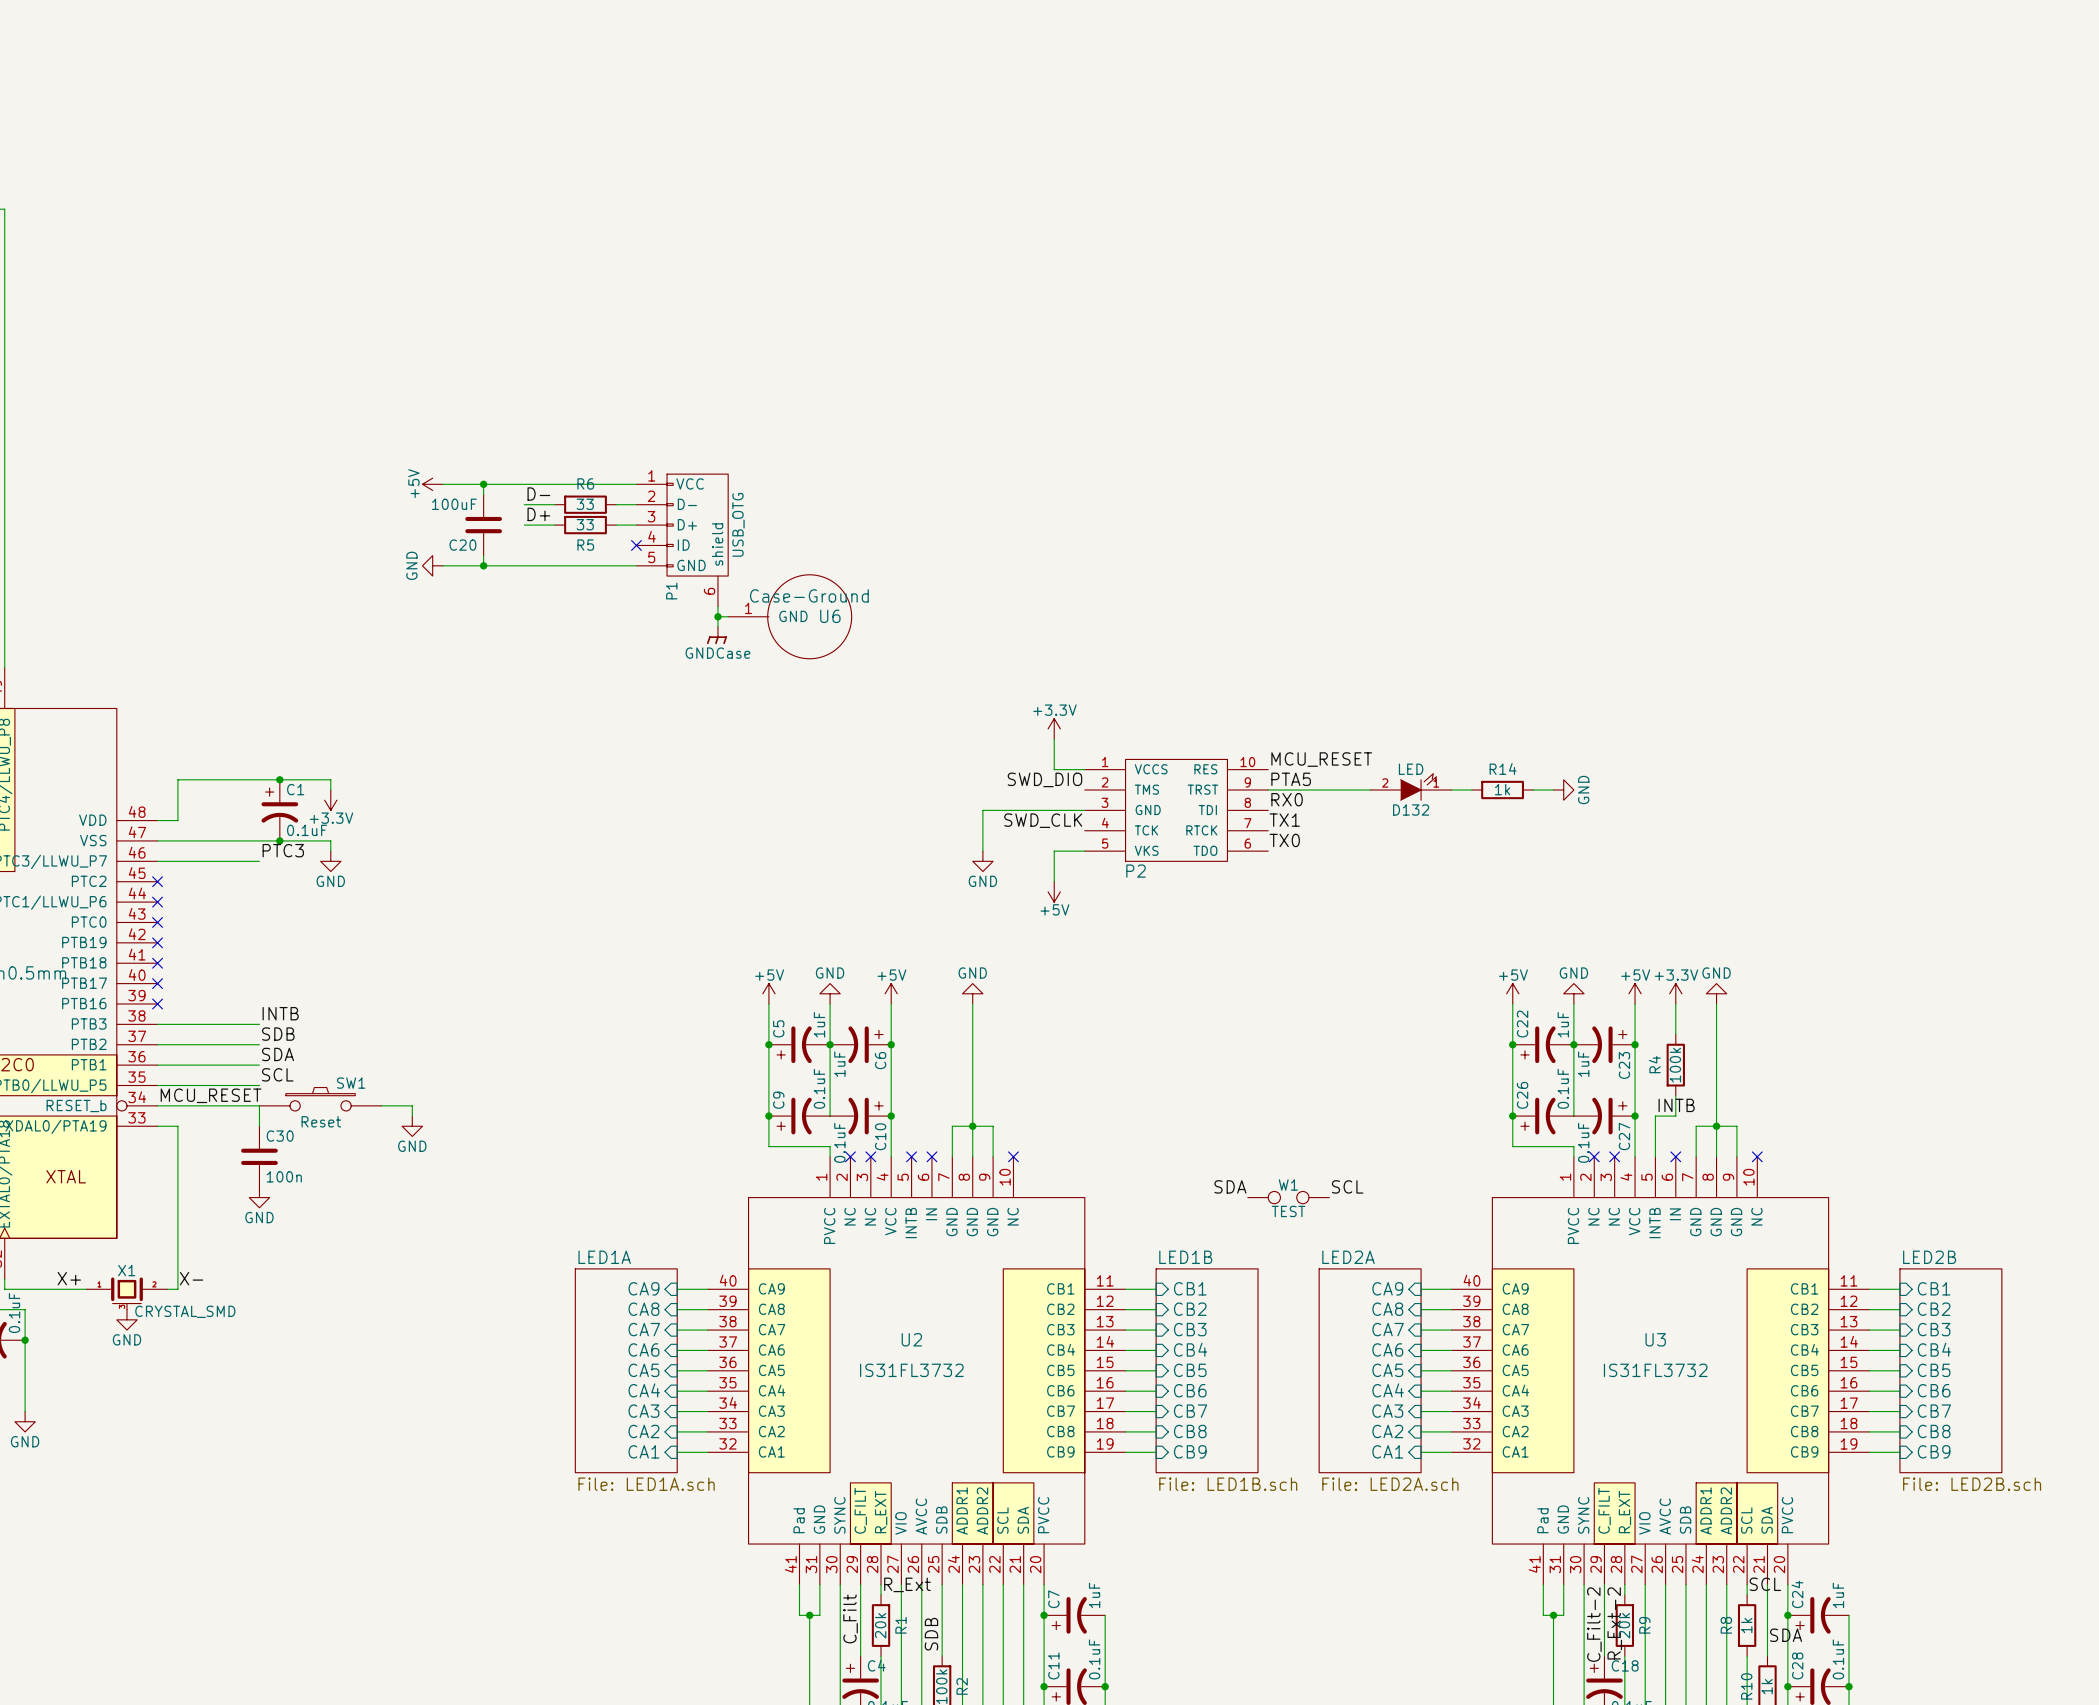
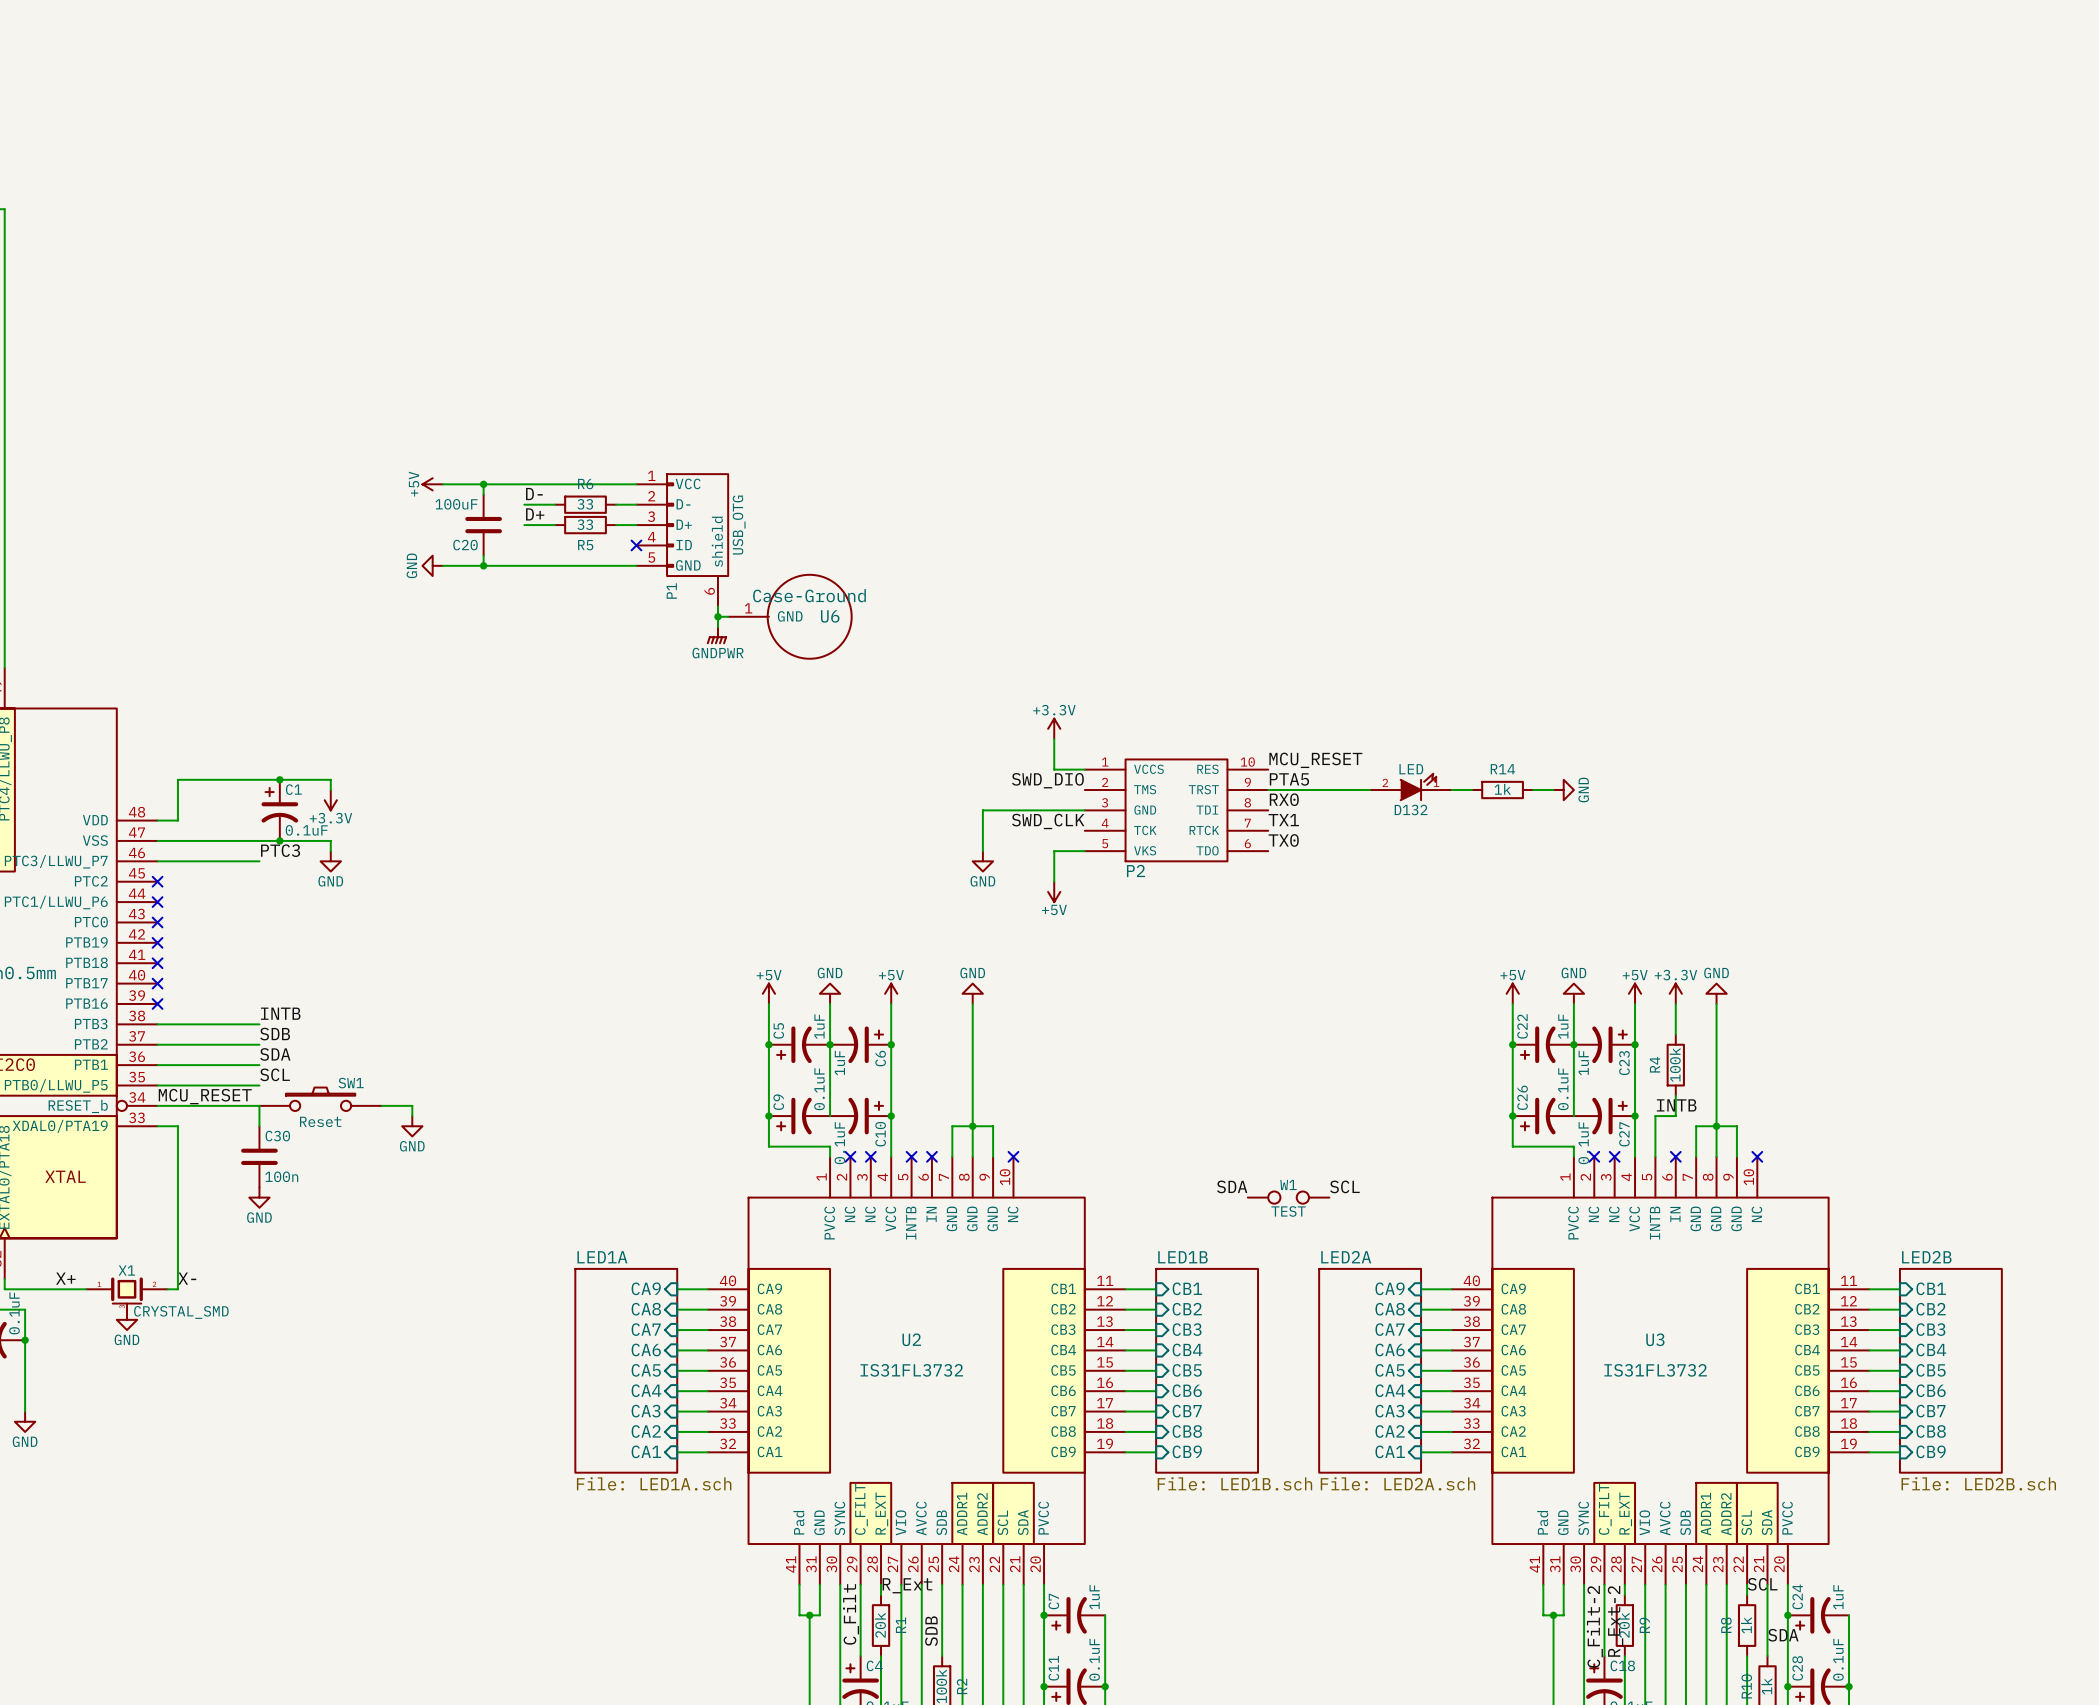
power symbol: GNDCase (716, 635) -> GNDPWR (716, 635)

